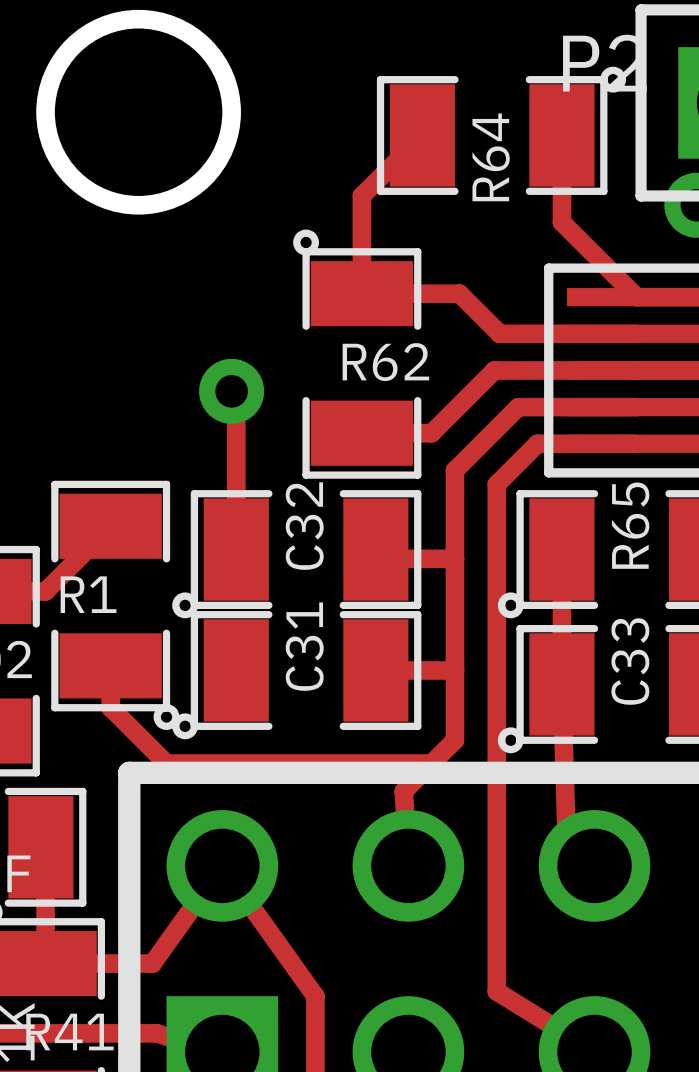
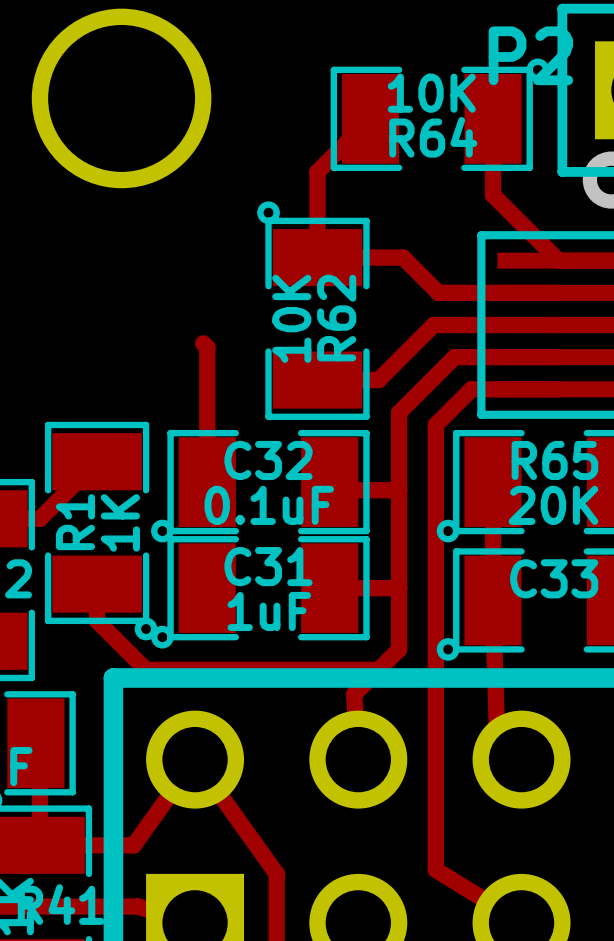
R64 value: none -> 10K (431, 93)
R64 name rotation: 0° (491, 157) -> 90° clockwise (433, 137)
R62 value: none -> 10K (291, 318)
R62 name rotation: 0° (385, 362) -> 90° counterclockwise (336, 318)
via: (231, 391) -> none
R65 name rotation: 0° (630, 525) -> 90° clockwise (554, 460)
C32 name rotation: 0° (304, 526) -> 90° clockwise (268, 460)
C32 value: none -> 0.1uF (269, 505)
R65 value: none -> 20K (553, 505)
R1 name rotation: 0° (88, 594) -> 90° counterclockwise (75, 522)
R1 value: none -> 1K (120, 522)
C31 name rotation: 0° (304, 646) -> 90° clockwise (268, 566)
C33 name rotation: 0° (630, 661) -> 90° clockwise (554, 578)
C31 value: none -> 1uF (269, 611)

